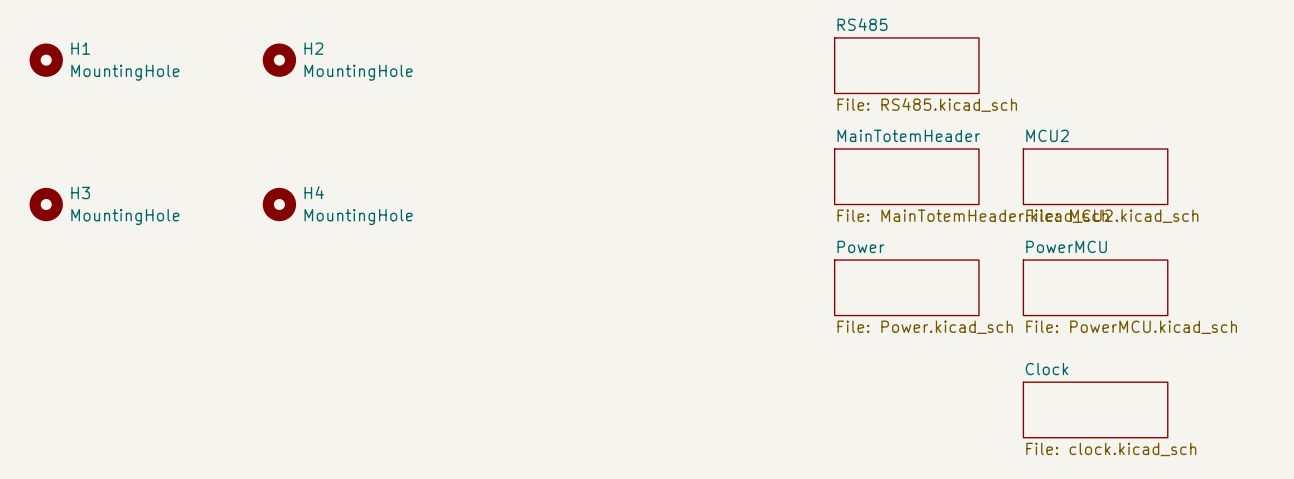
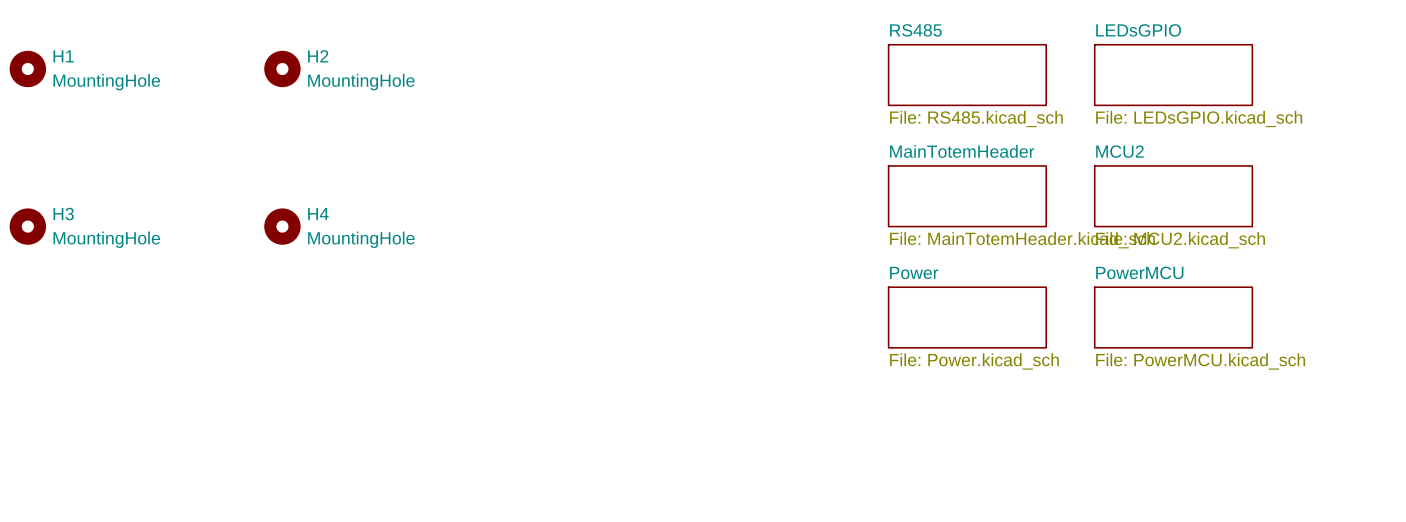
sheet LEDsGPIO: none -> File: LEDsGPIO.kicad_sch (1173, 75)
sheet Clock: File: clock.kicad_sch (1095, 409) -> none

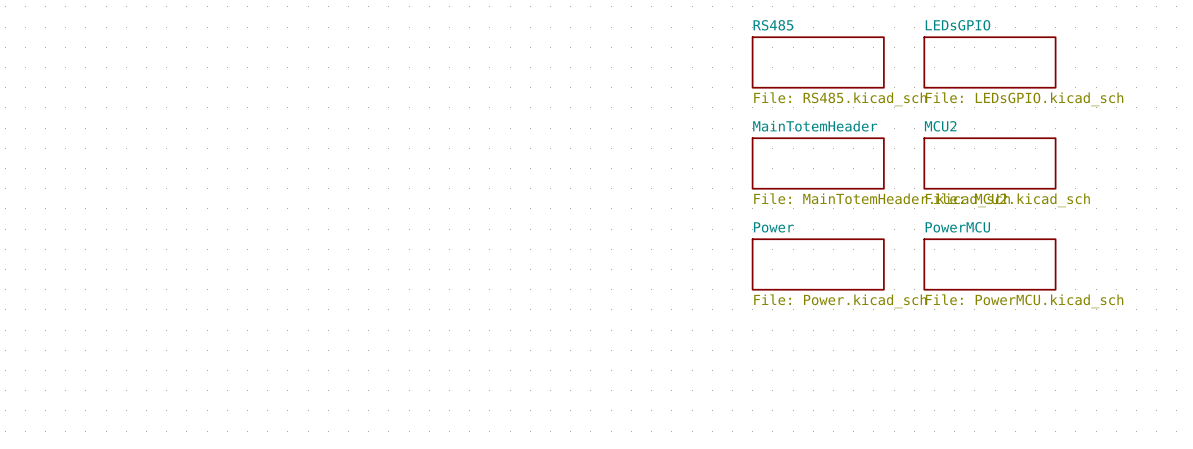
H1: MountingHole (27, 68) -> none
H2: MountingHole (282, 68) -> none
H3: MountingHole (27, 226) -> none
H4: MountingHole (282, 226) -> none

